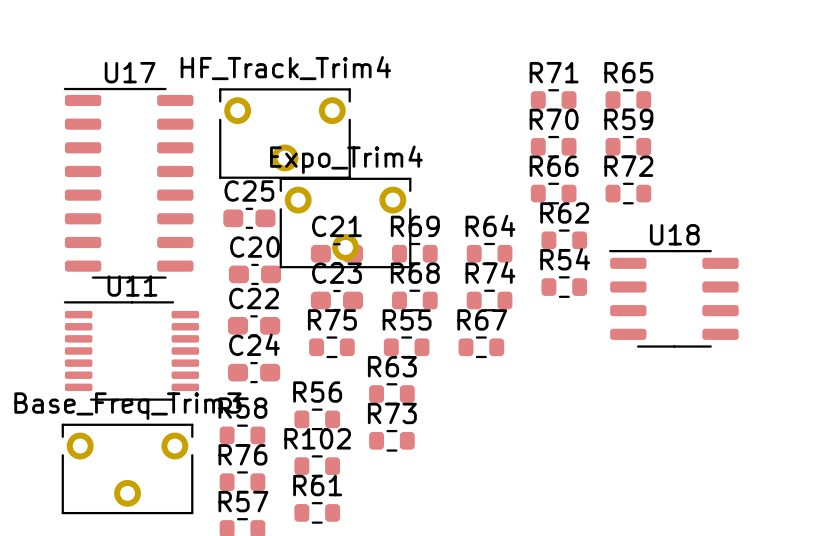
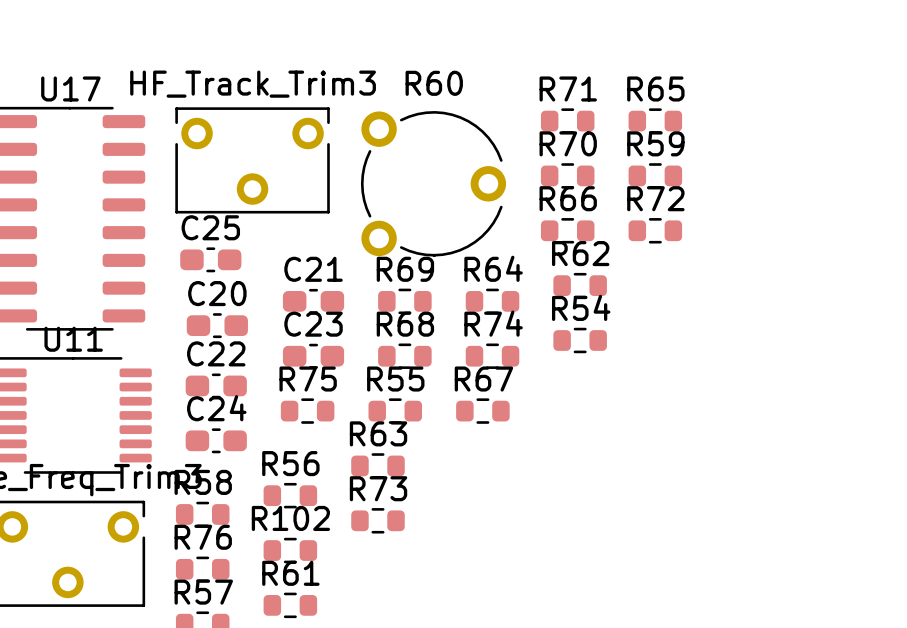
HF_Track_Trim4 name: HF_Track_Trim4 (285, 68) -> HF_Track_Trim3 (253, 84)
R60: none -> (433, 183)
Expo_Trim4: (345, 222) -> none
U18: (673, 298) -> none

